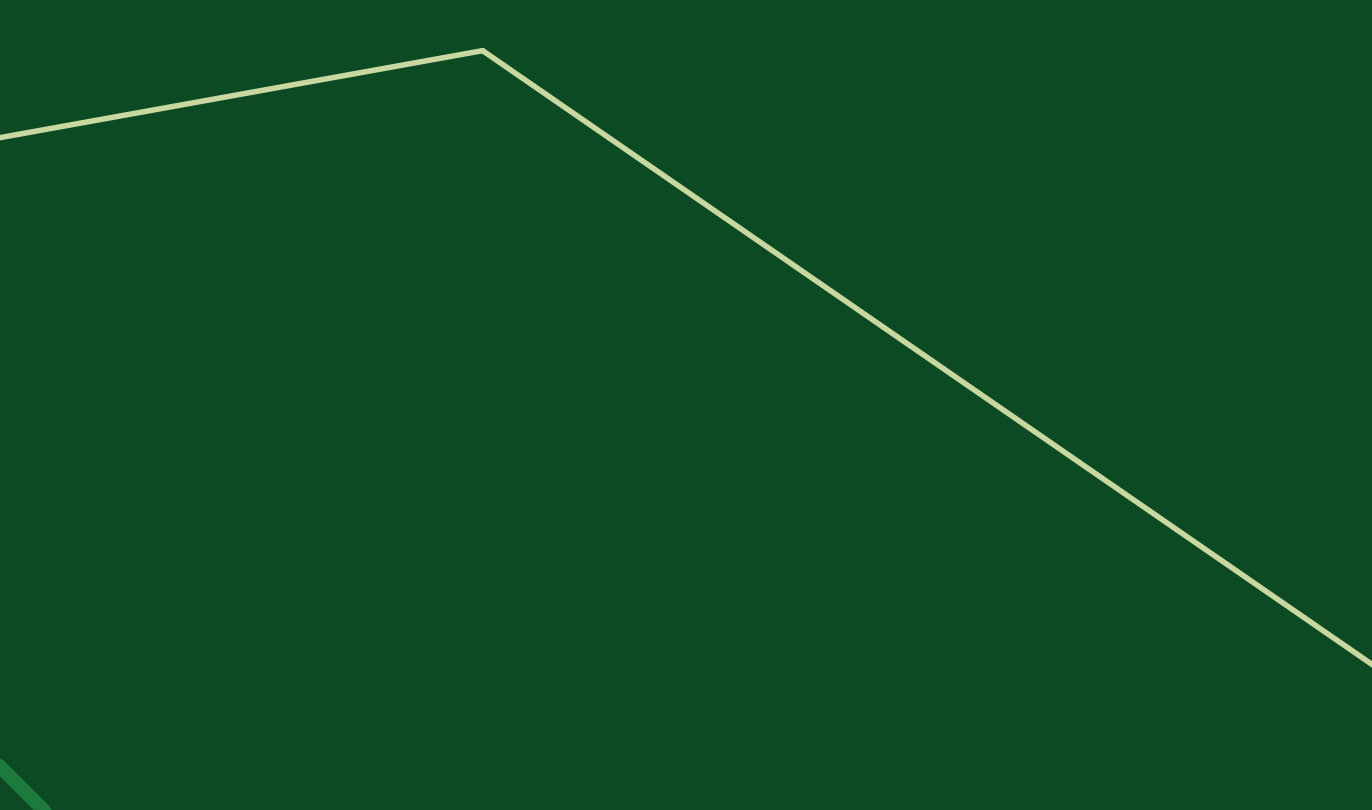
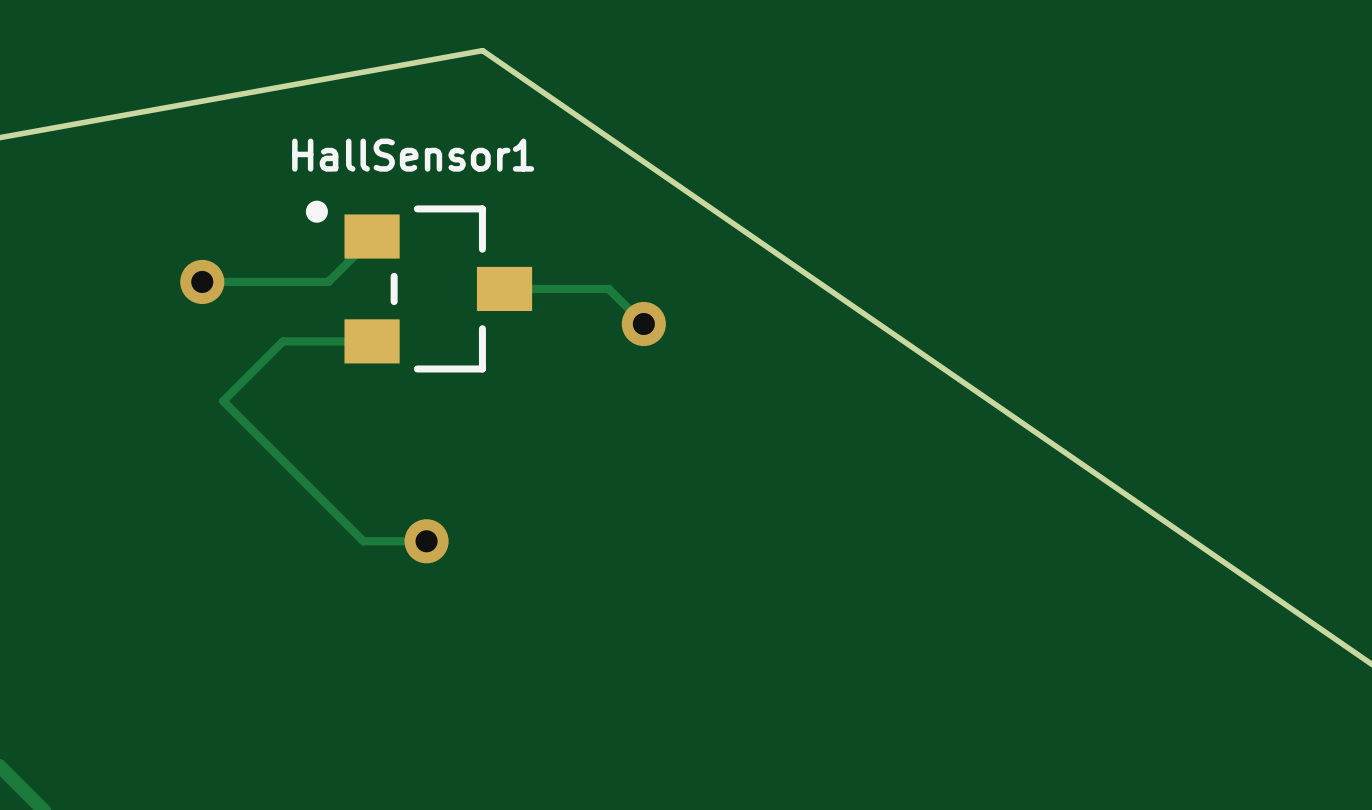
track: none -> (372, 236) (328, 281) (202, 281)
via: none -> (202, 281)
HallSensor1: none -> (418, 286)
track: none -> (504, 288) (608, 288) (643, 324)
via: none -> (643, 324)
track: none -> (372, 341) (283, 341) (223, 401) (363, 541) (426, 541)
via: none -> (426, 541)

